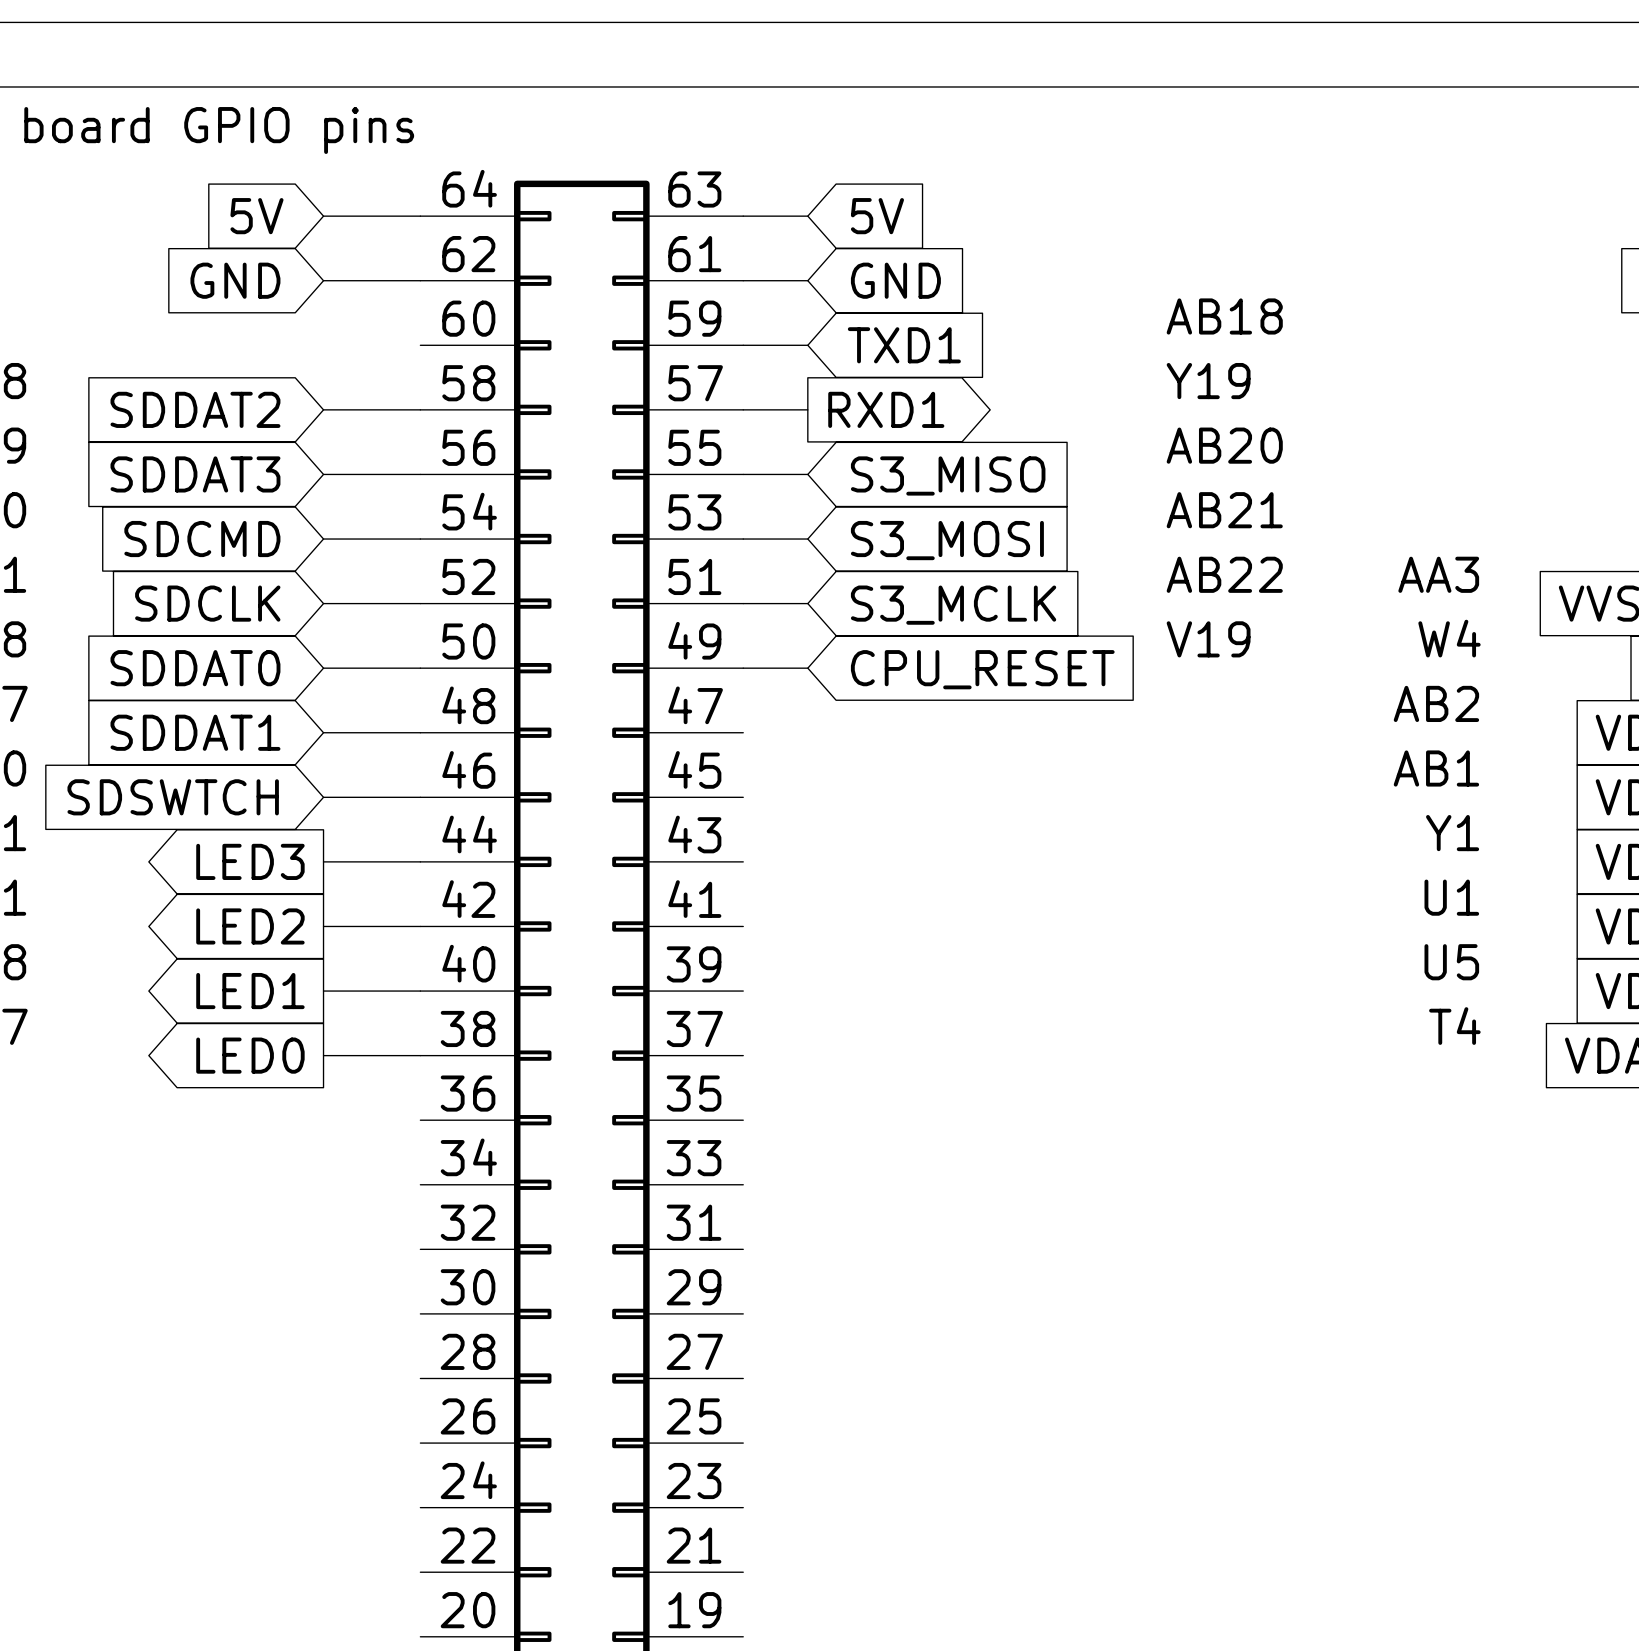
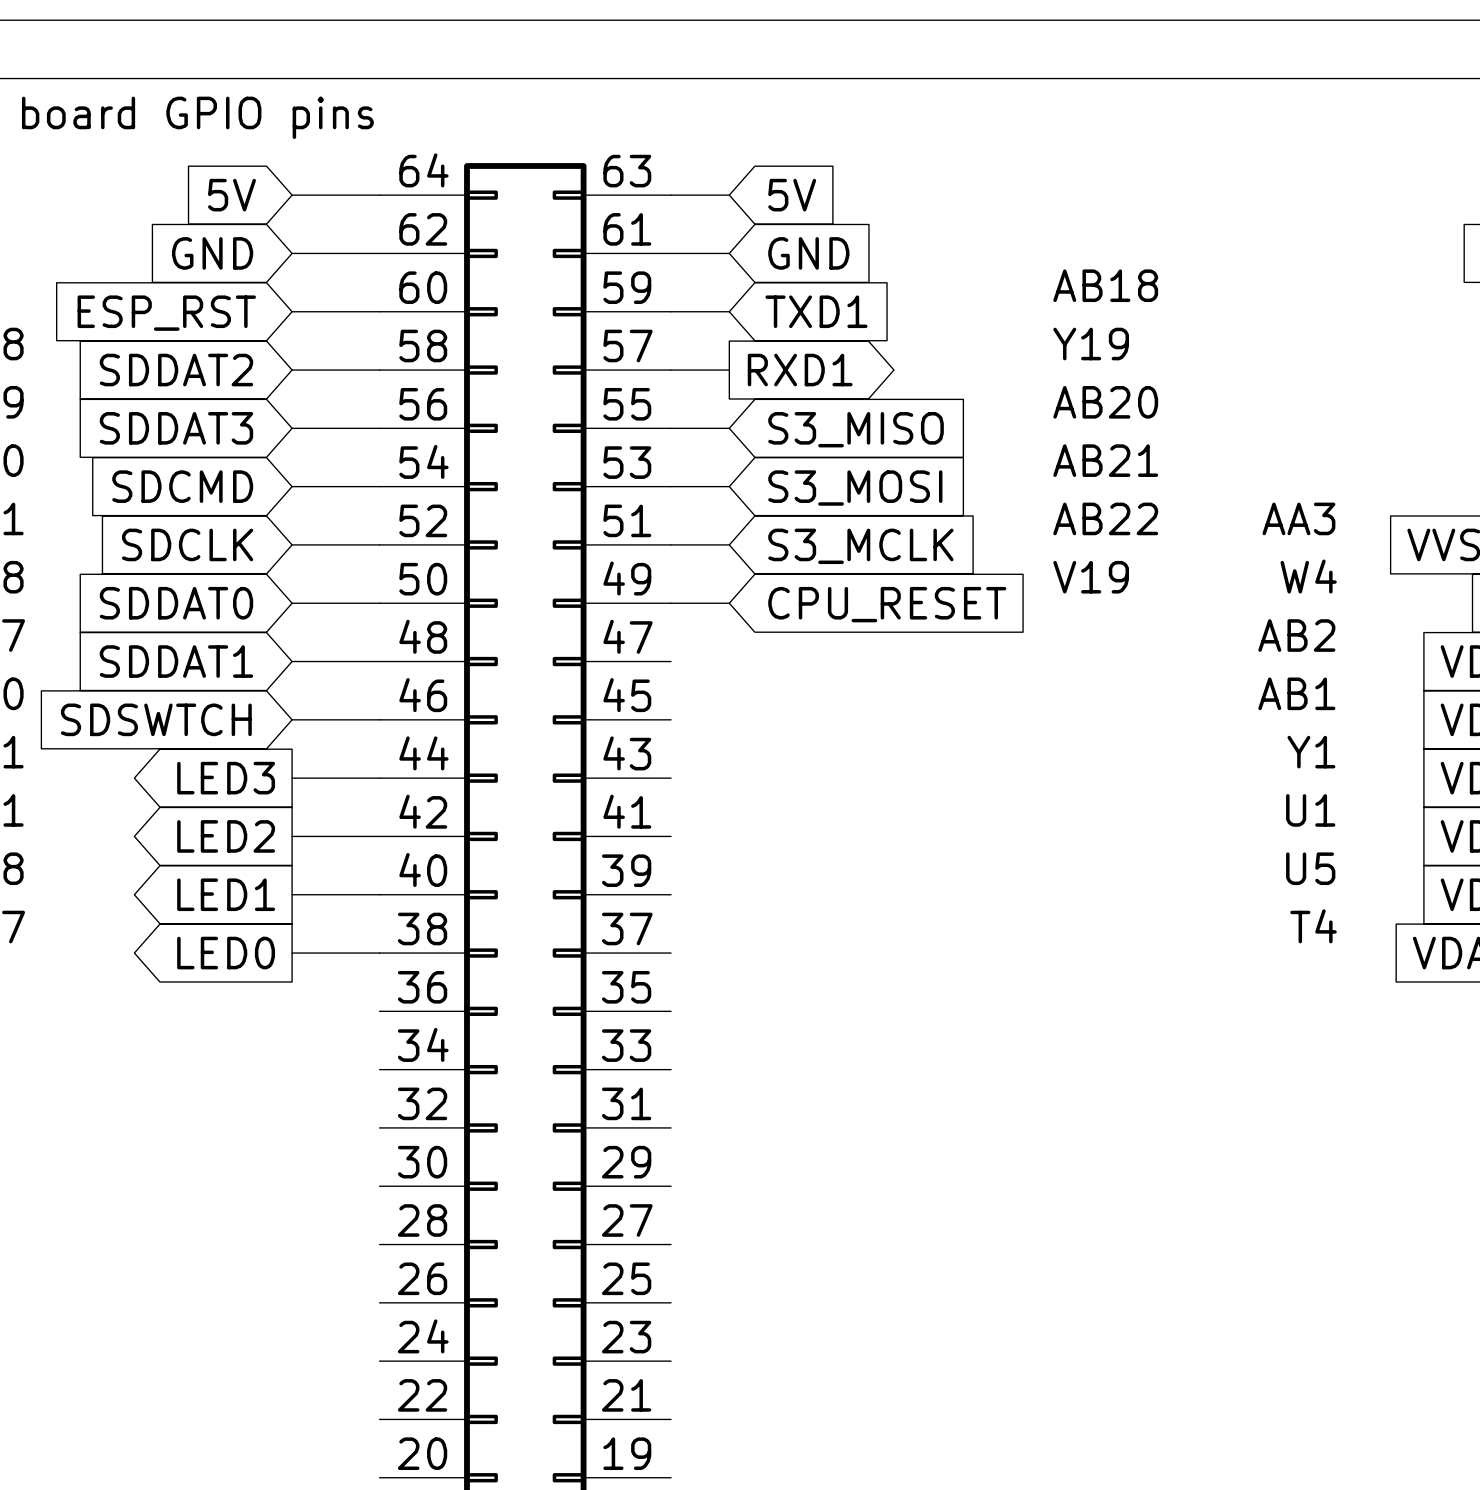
wire: none -> (292, 311) (379, 311)
global label: none -> ESP_RST (166, 313)

